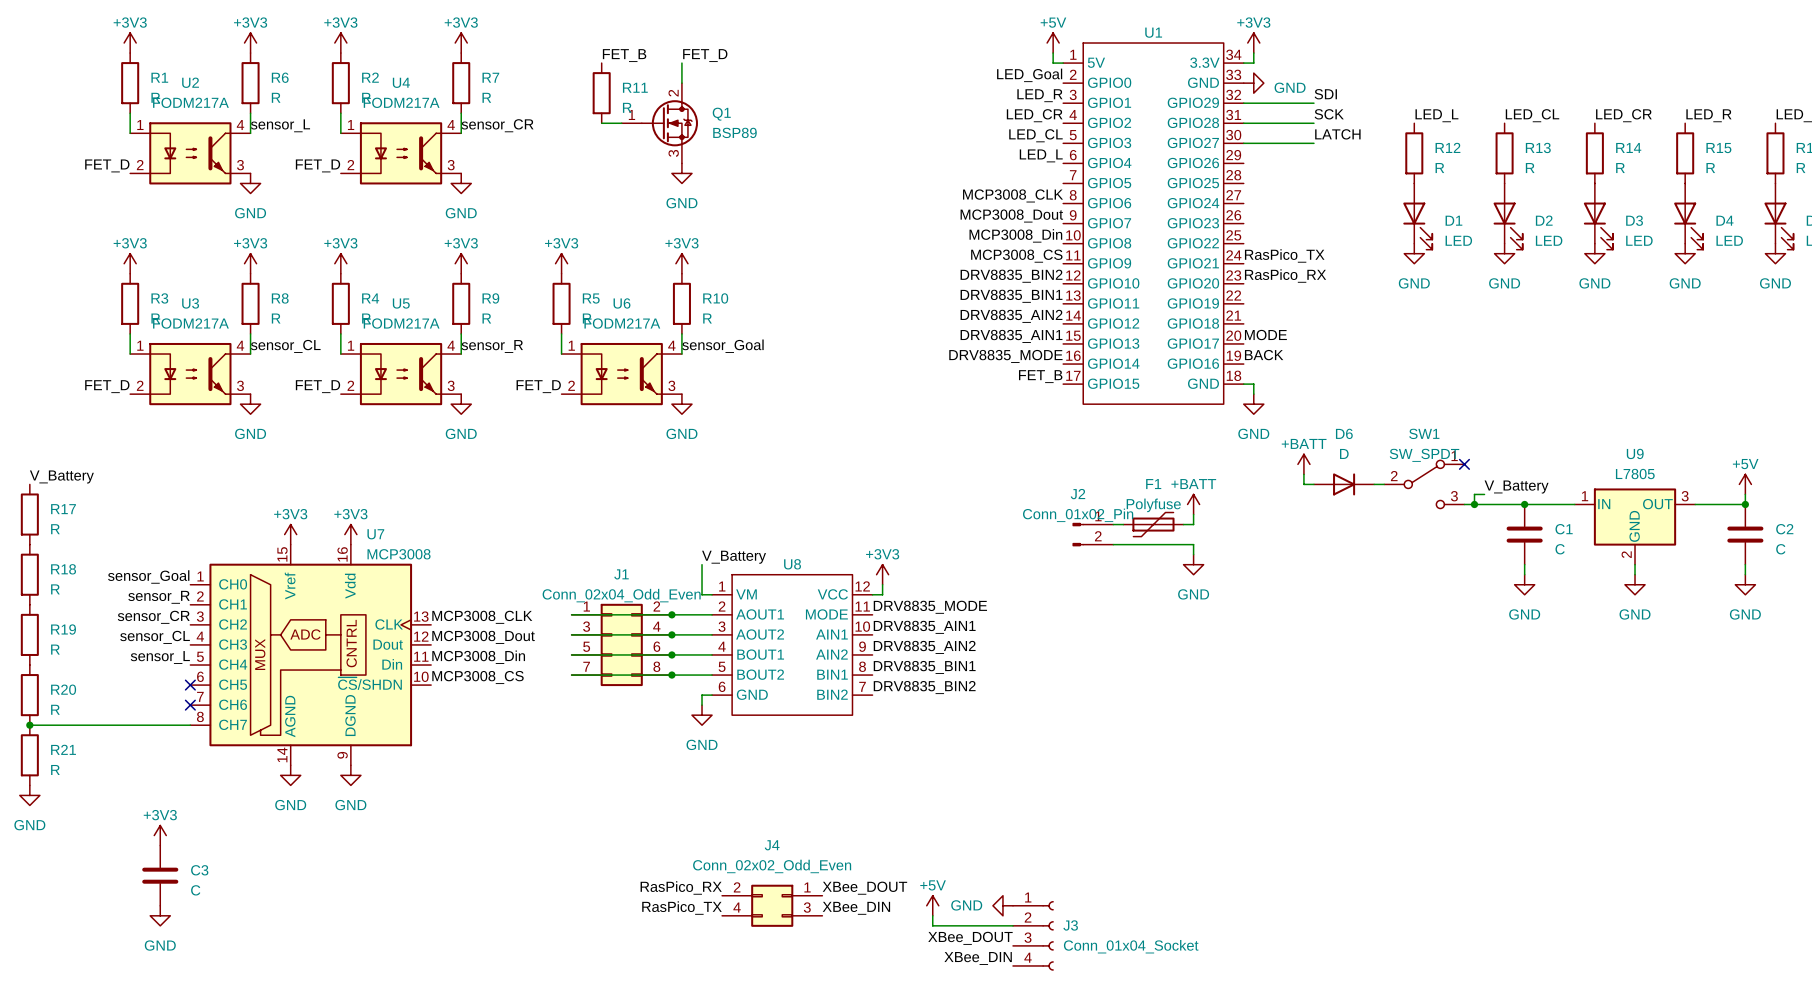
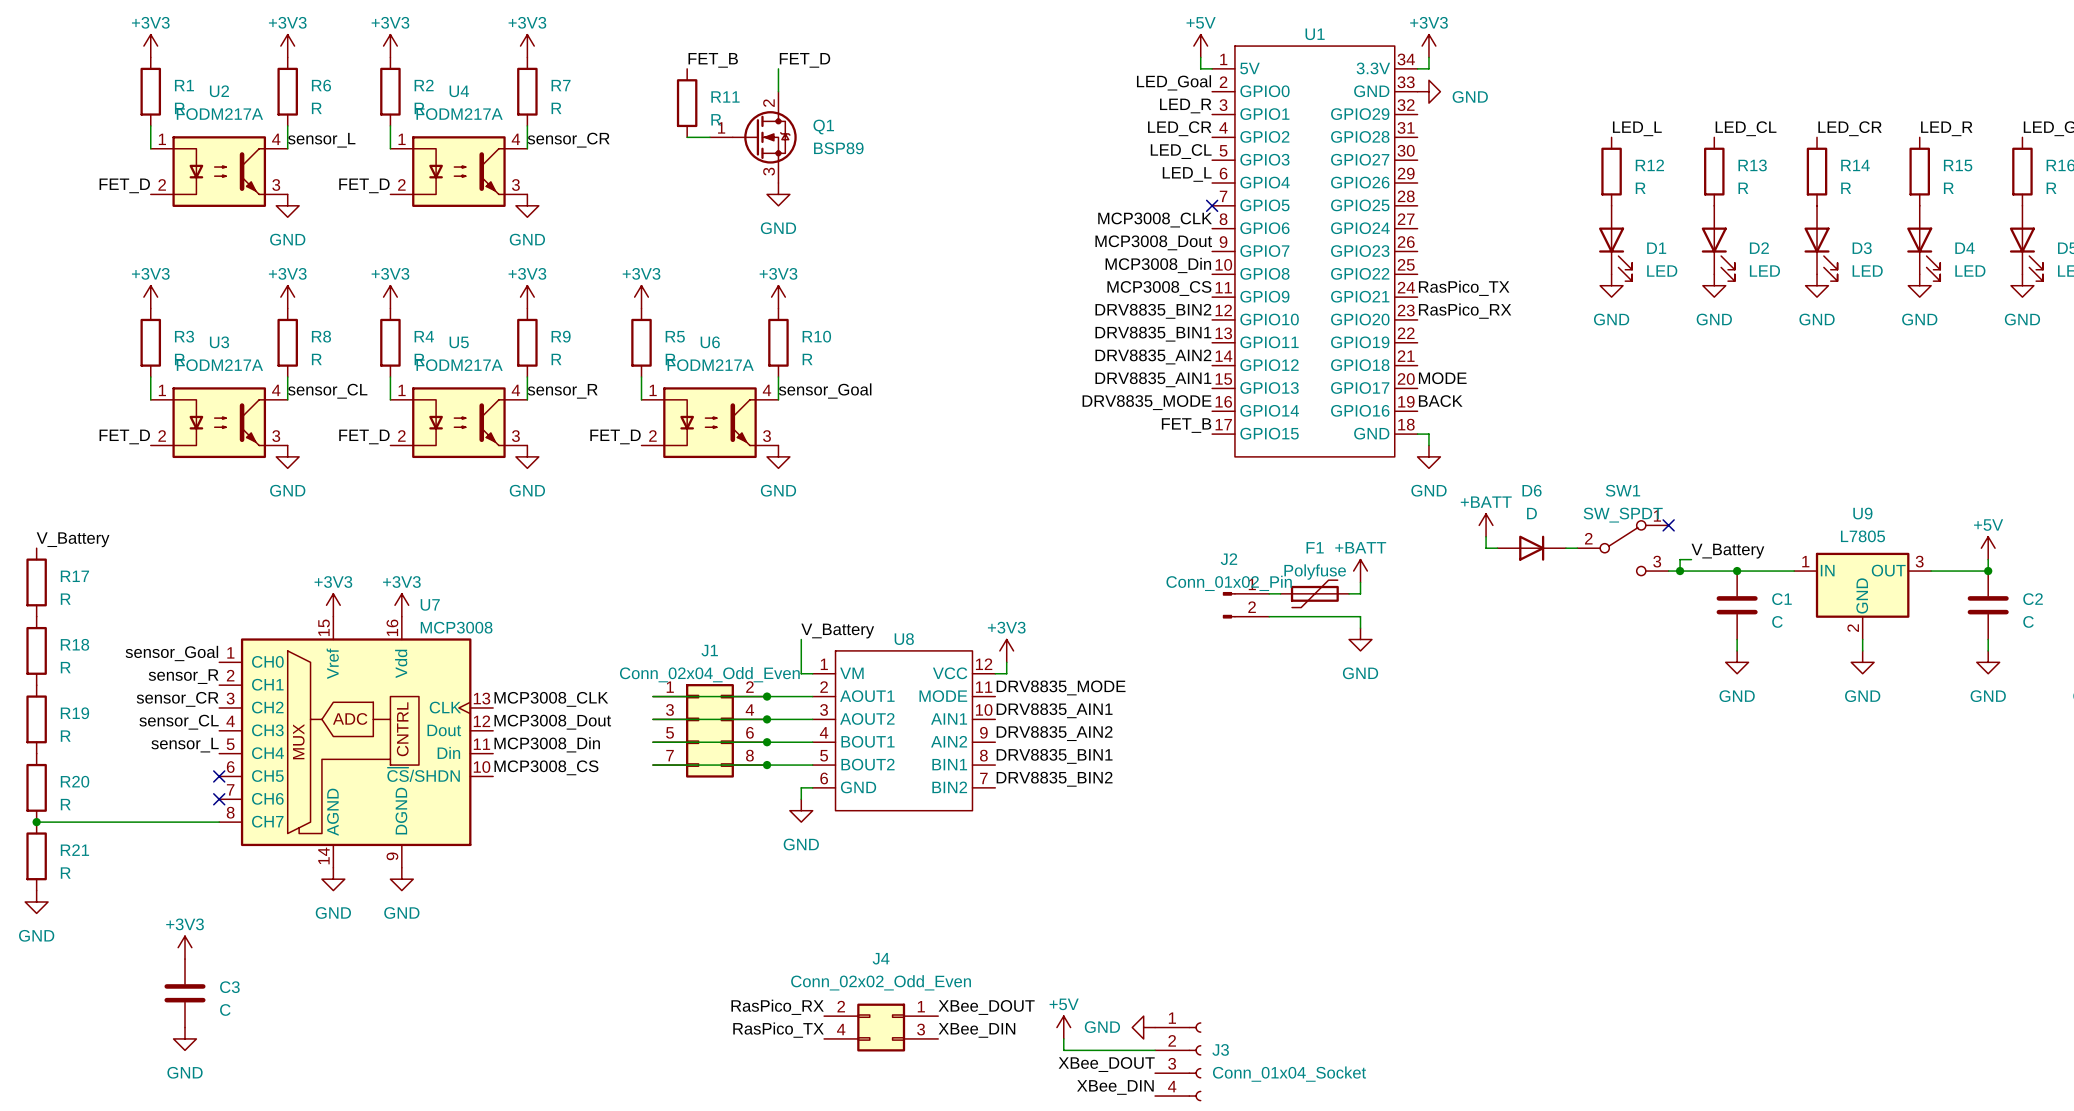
label: SDI (1325, 94) -> none
wire: (1243, 103) (1313, 103) -> none
label: SCK (1329, 114) -> none
wire: (1243, 123) (1313, 123) -> none
label: LATCH (1337, 134) -> none
wire: (1243, 143) (1313, 143) -> none
no-connect mark: none -> (1212, 205)

